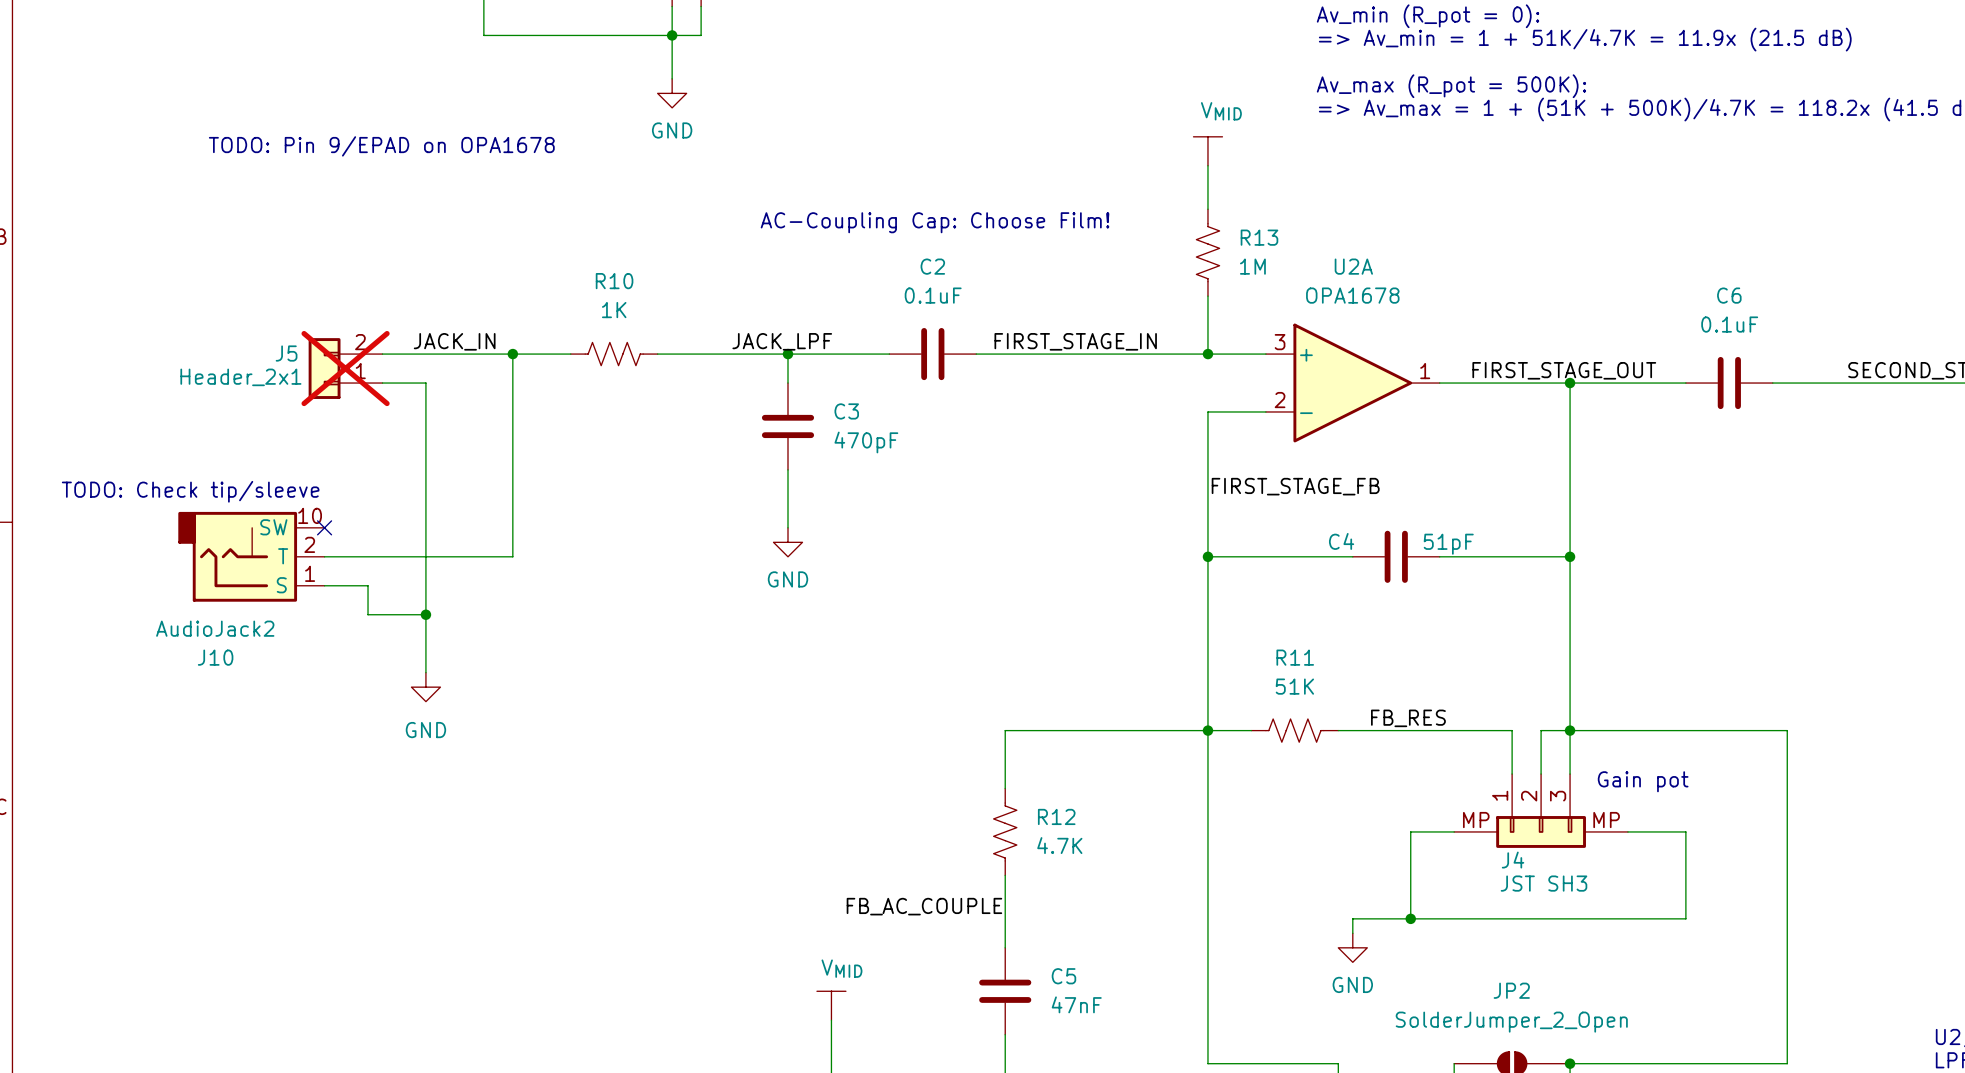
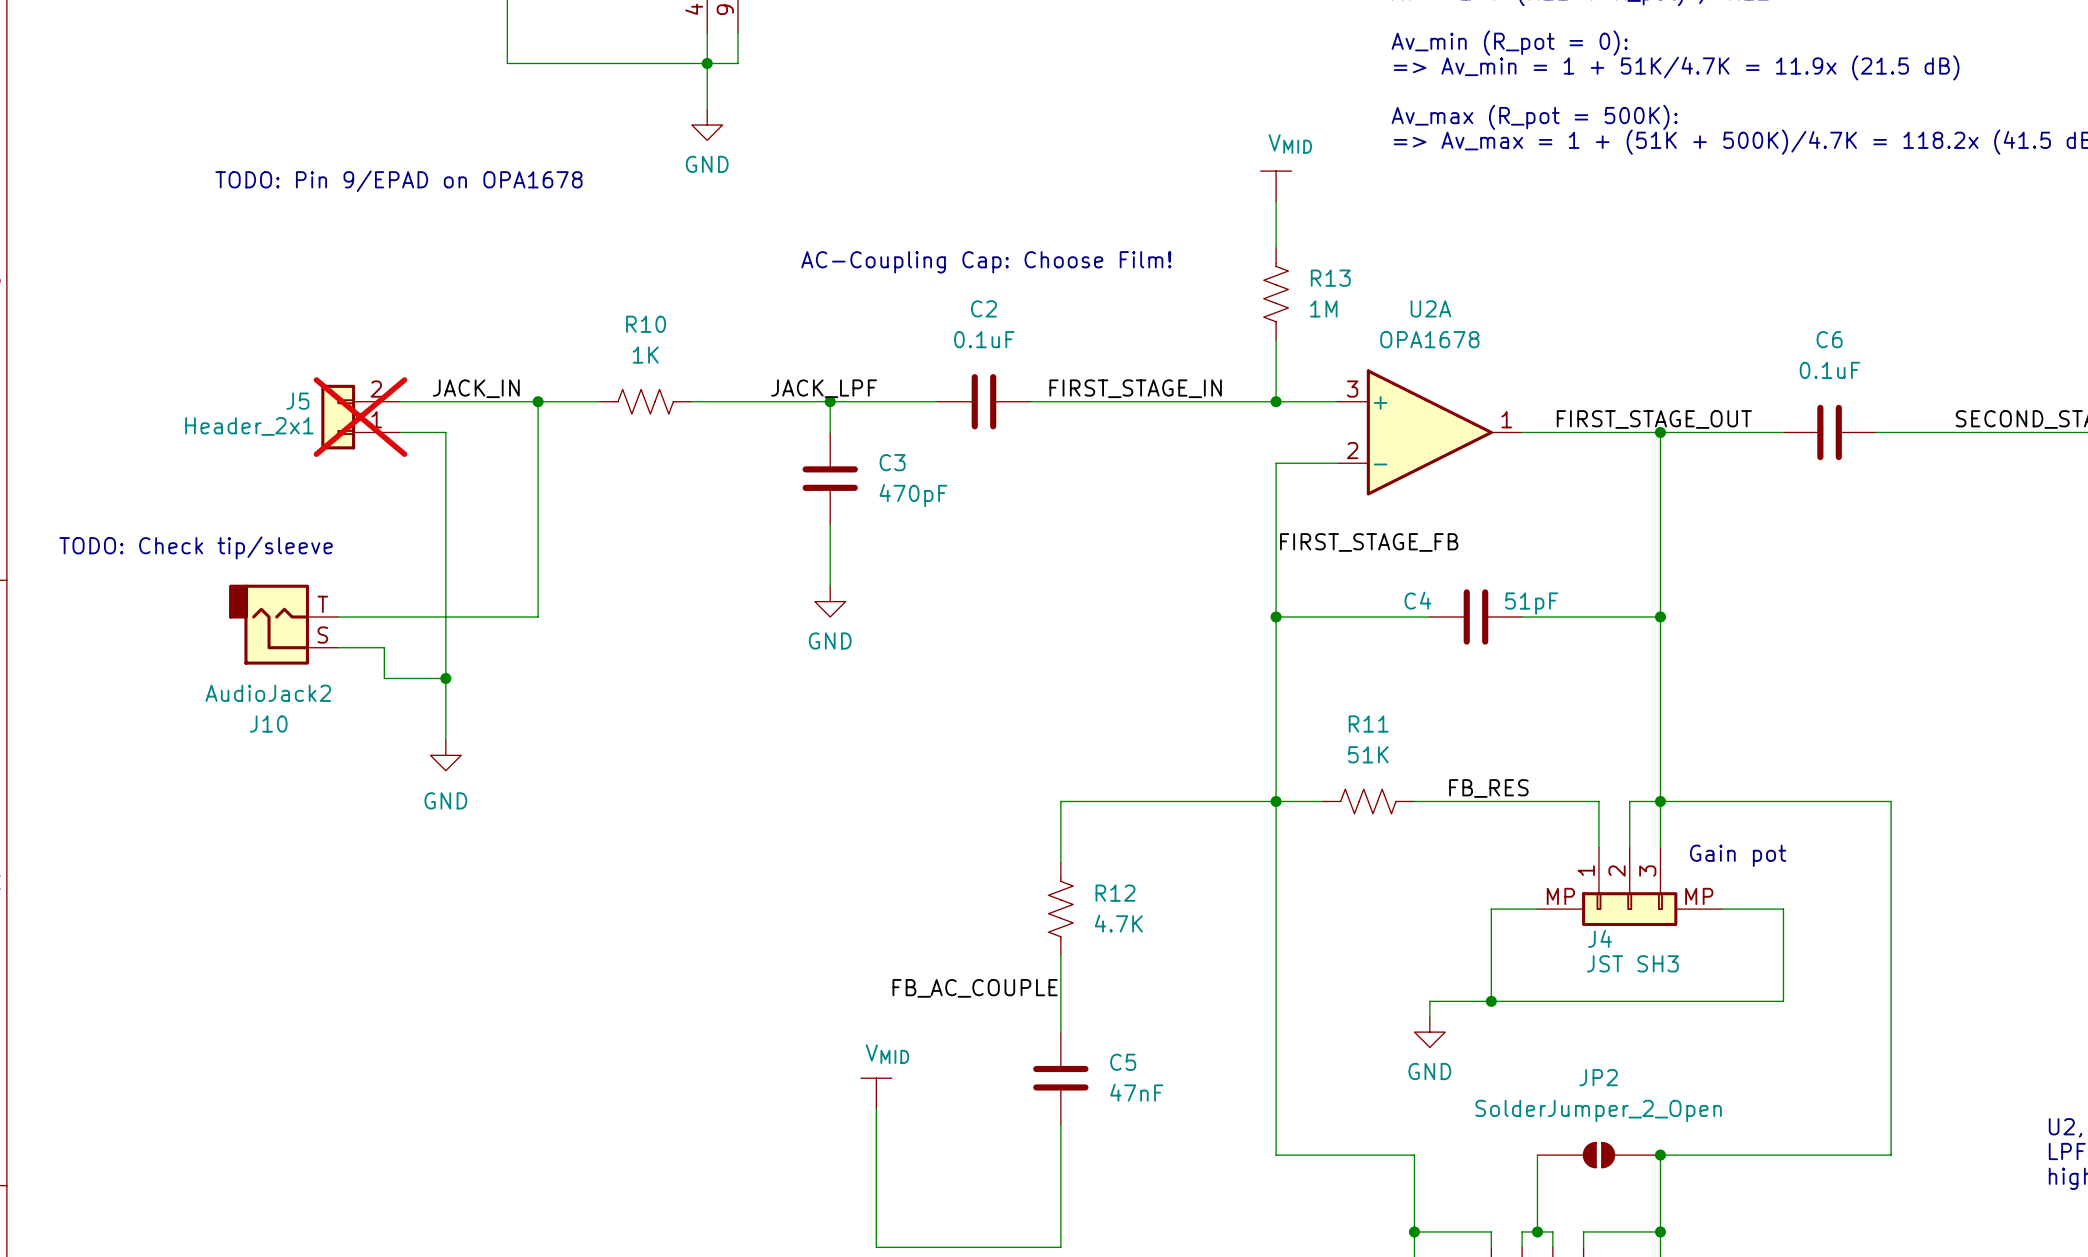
J10 symbol: [178, 511, 325, 602] -> [229, 584, 339, 665]
no-connect mark: (324, 527) -> none
J10 value position: AudioJack2 (215, 628) -> AudioJack2 (268, 693)
J10 name position: J10 (215, 657) -> J10 (268, 724)

